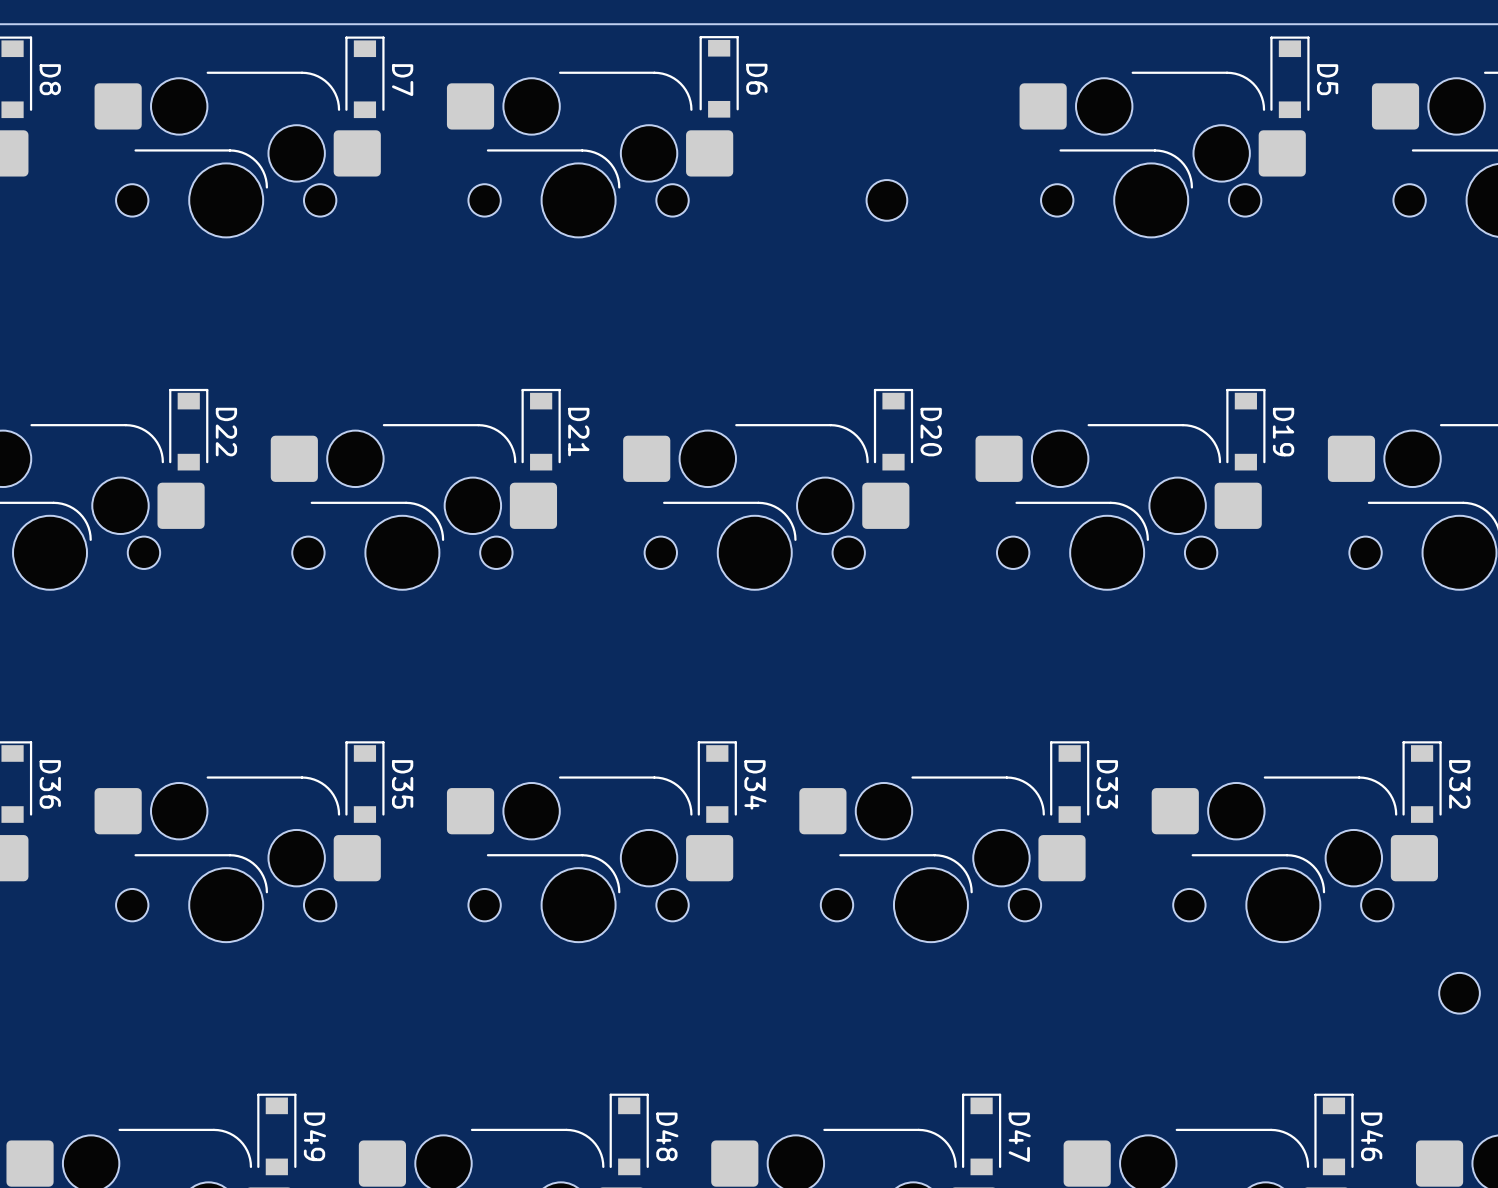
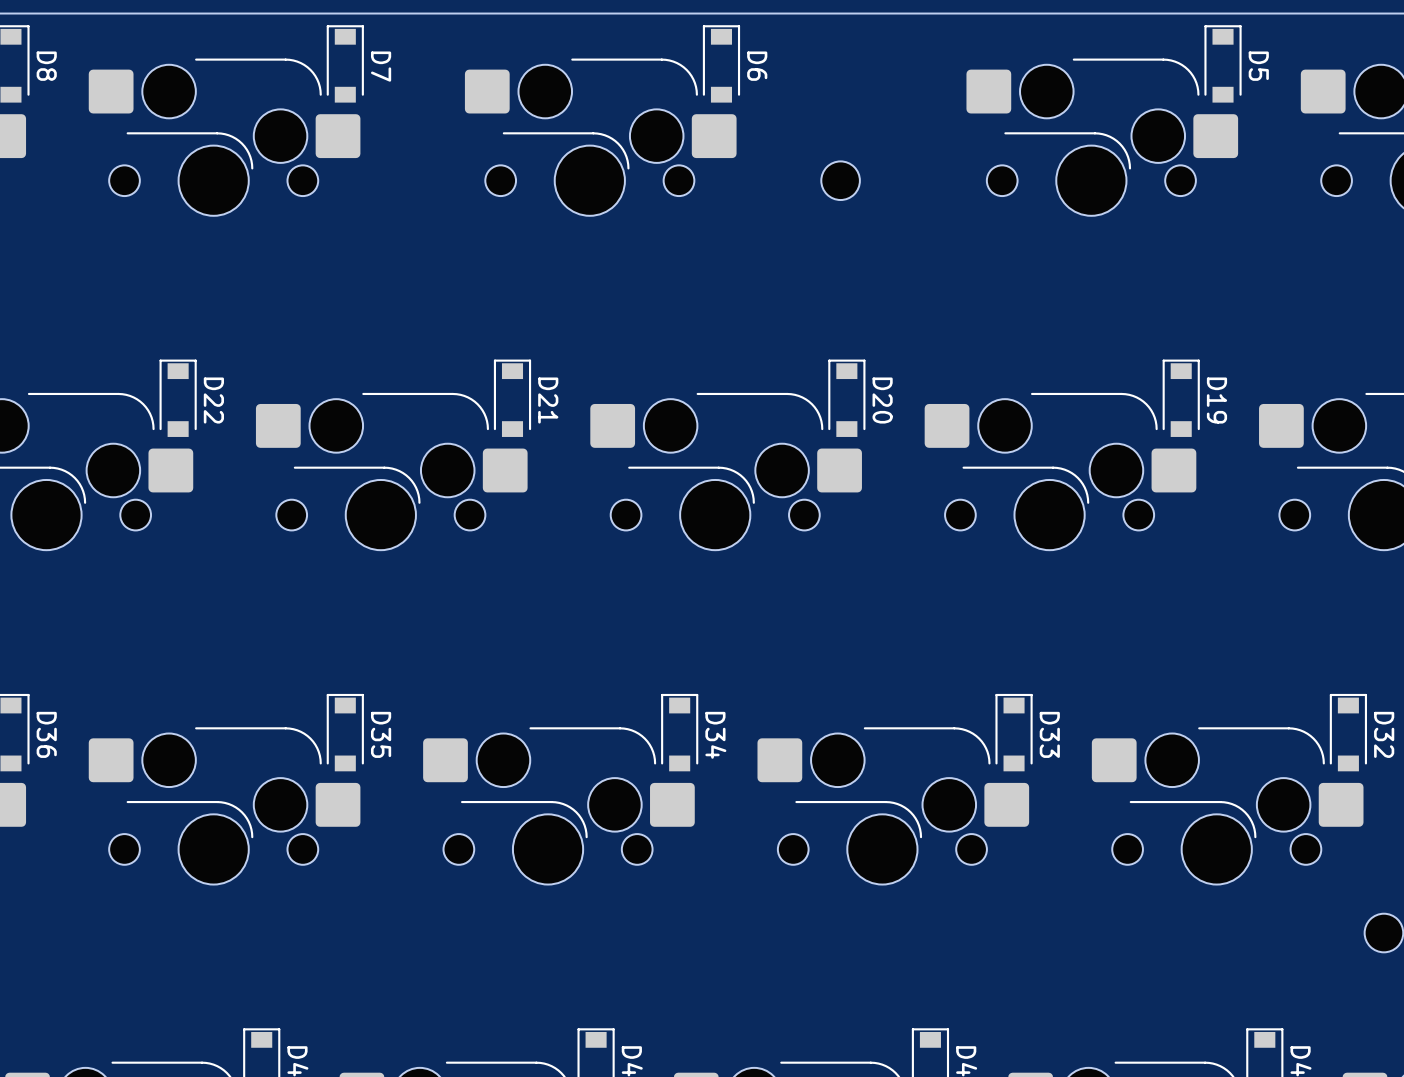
D6 position: (719, 76) -> (721, 63)
part position: (590, 154) -> (600, 137)

